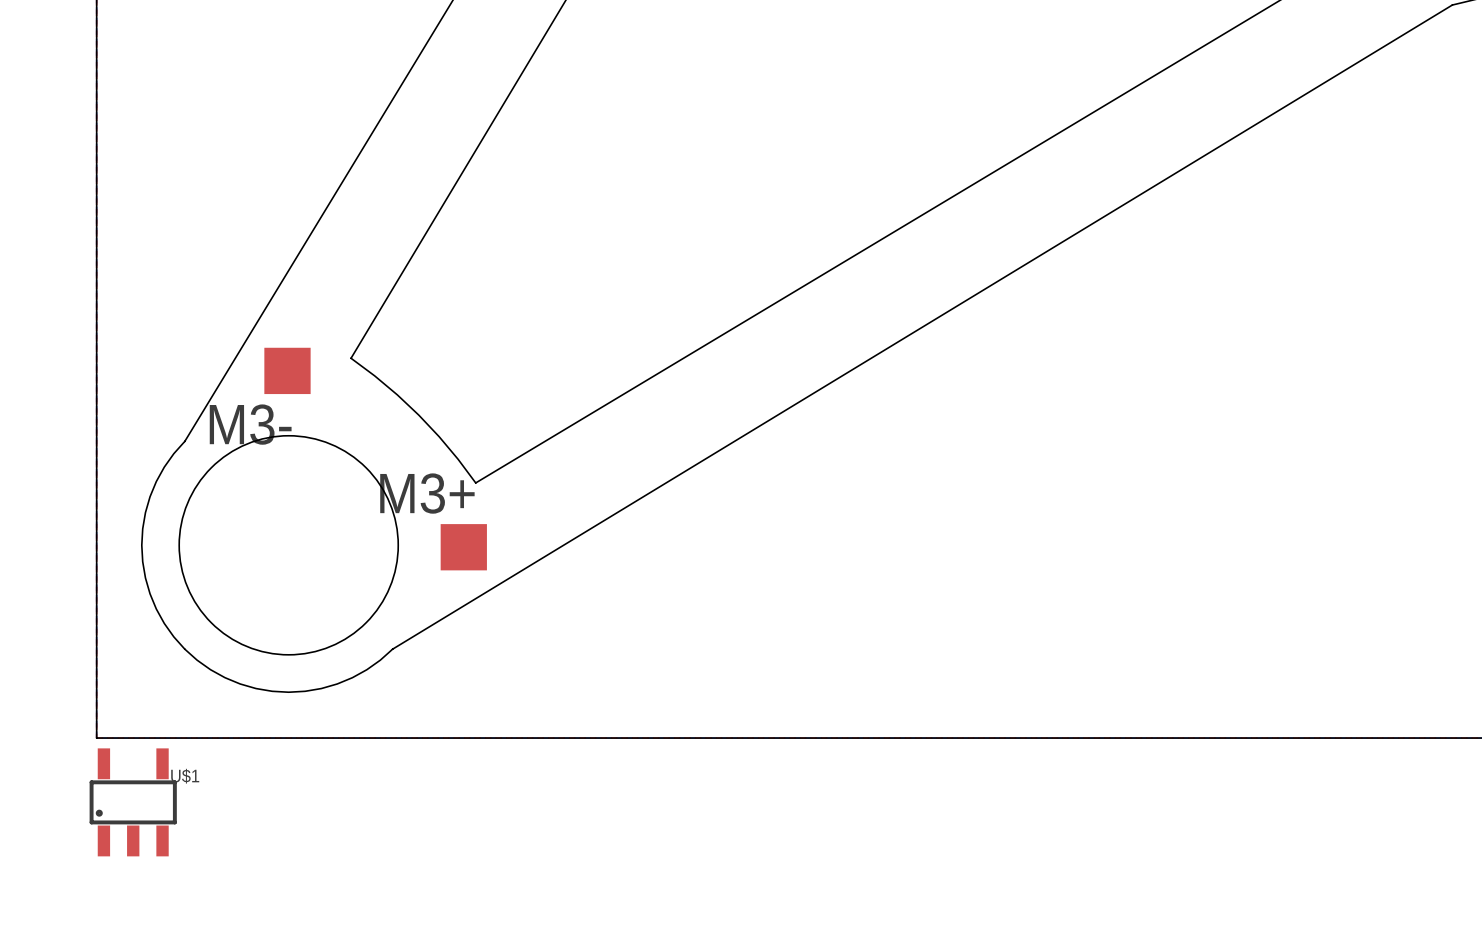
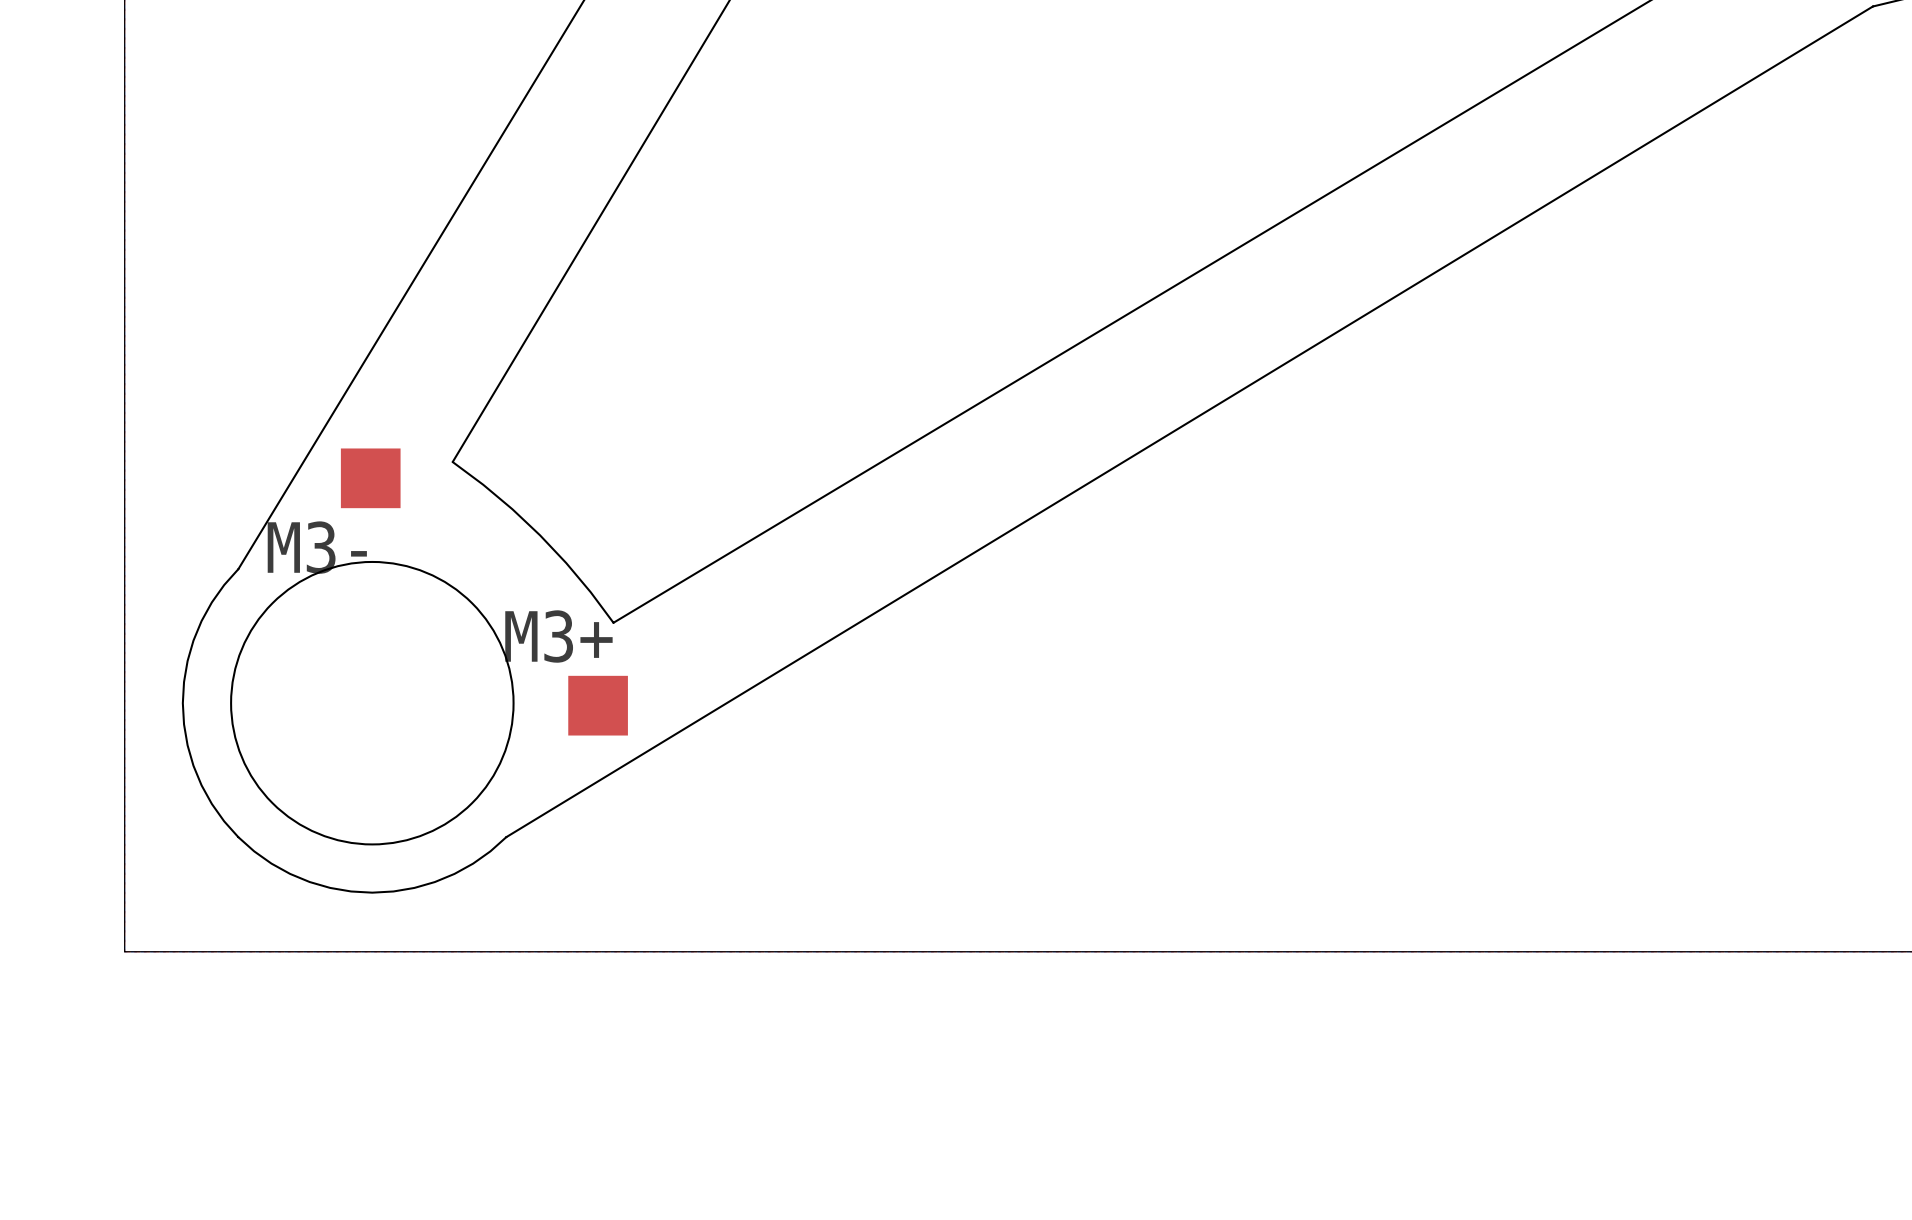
U$1: (133, 802) -> none

